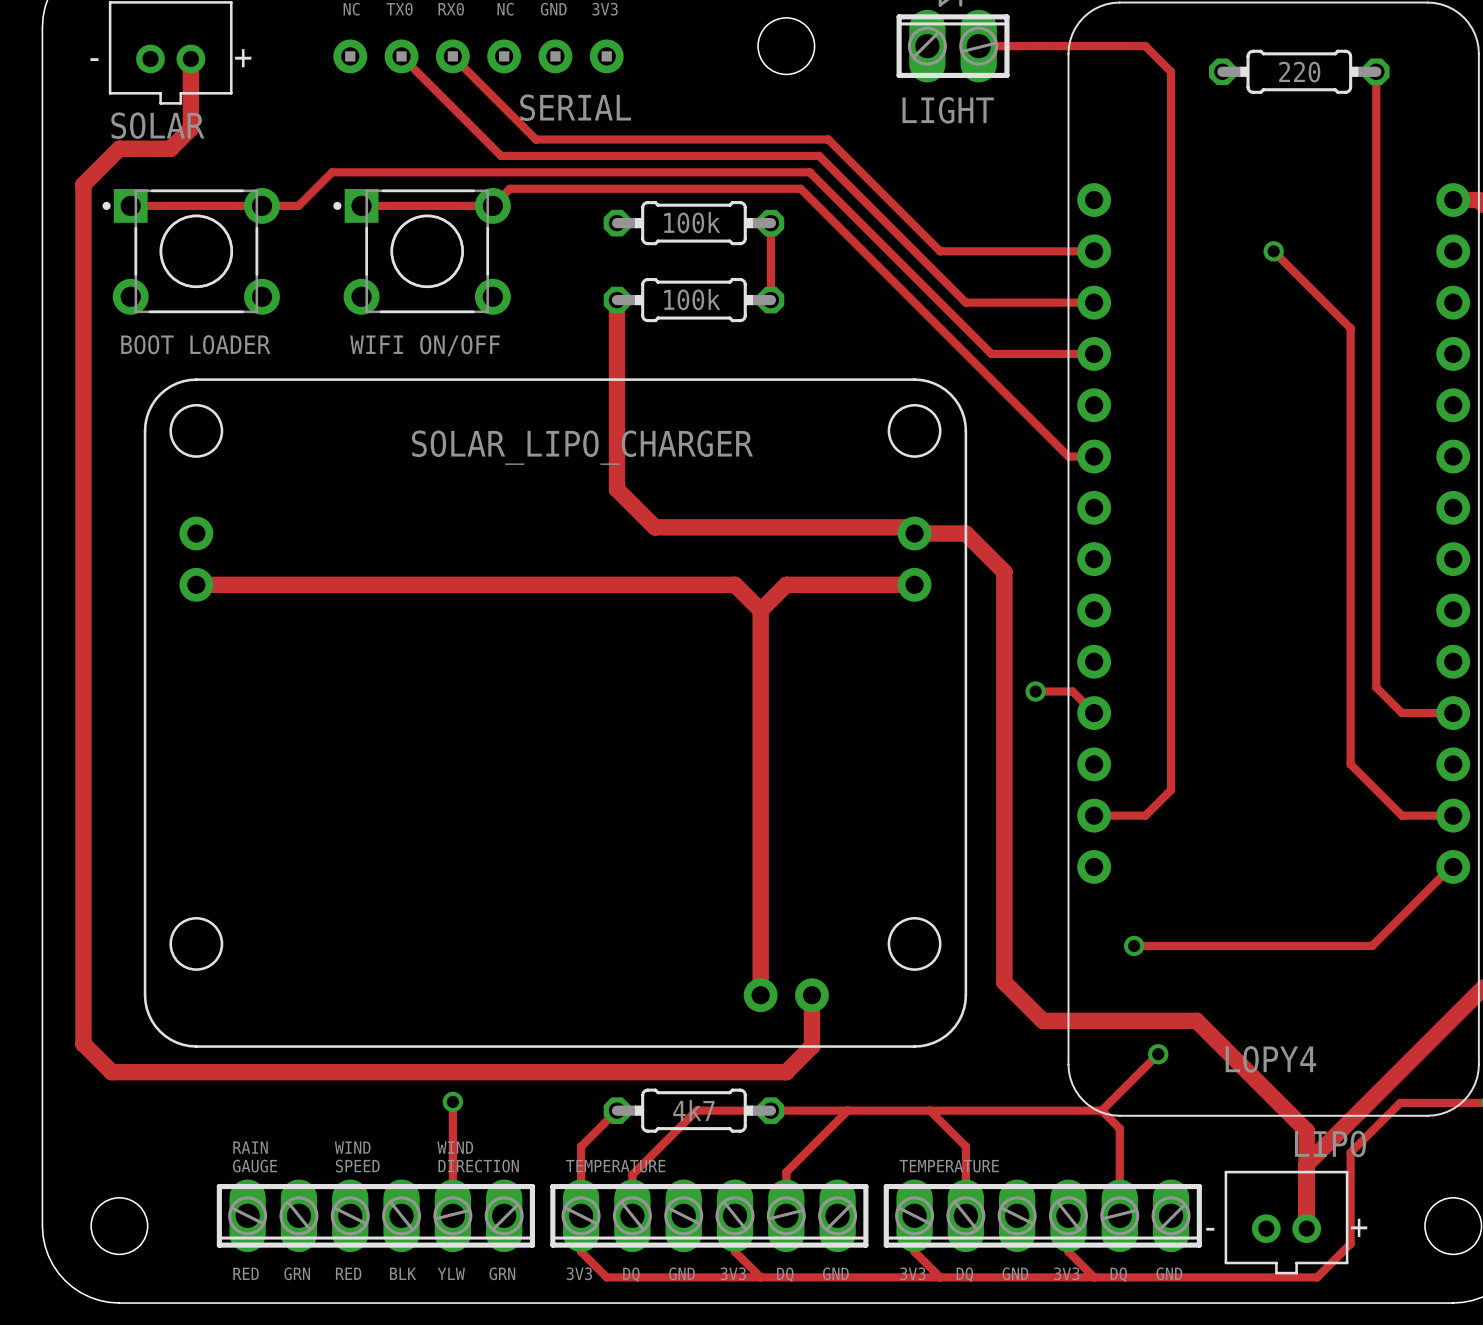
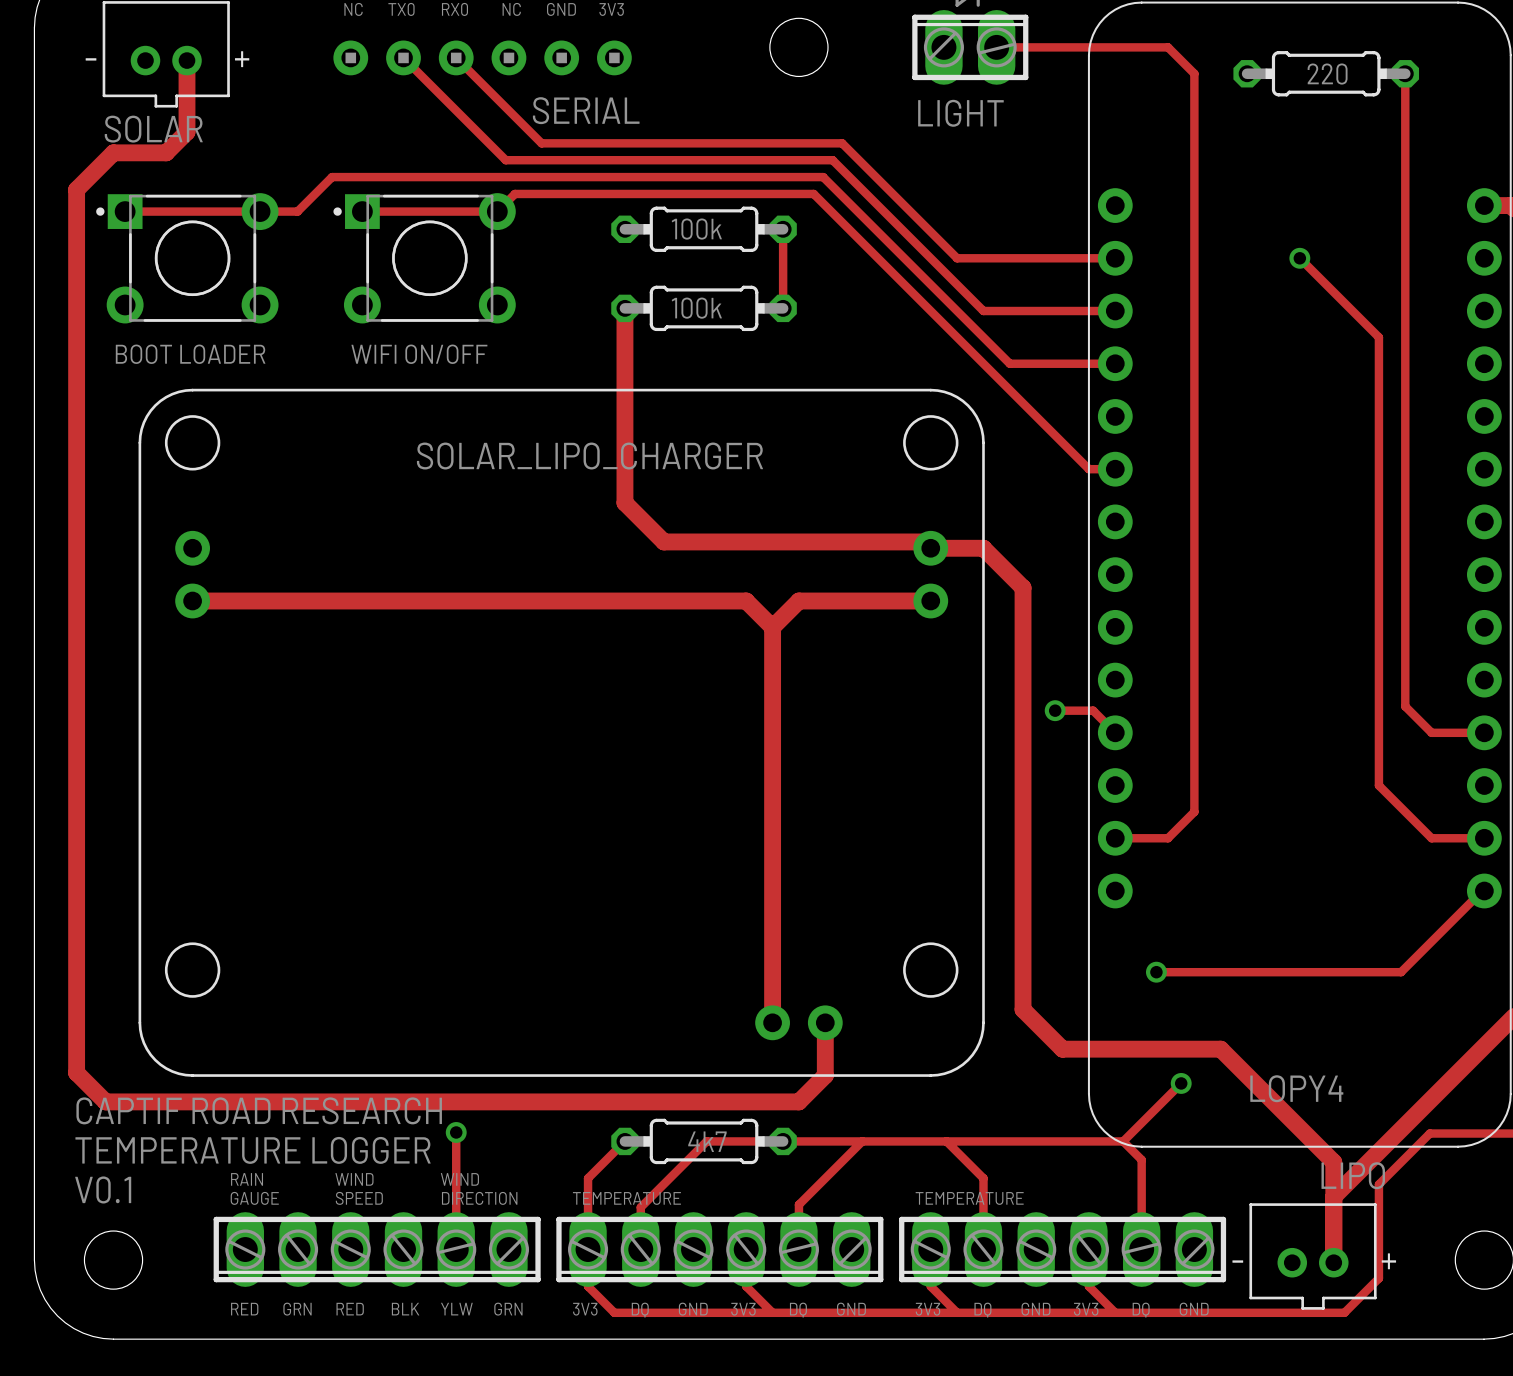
text: none -> CAPTIF ROAD RESEARCH (259, 1110)
text: none -> TEMPERATURE LOGGER (253, 1150)
text: none -> V0.1 (103, 1189)

